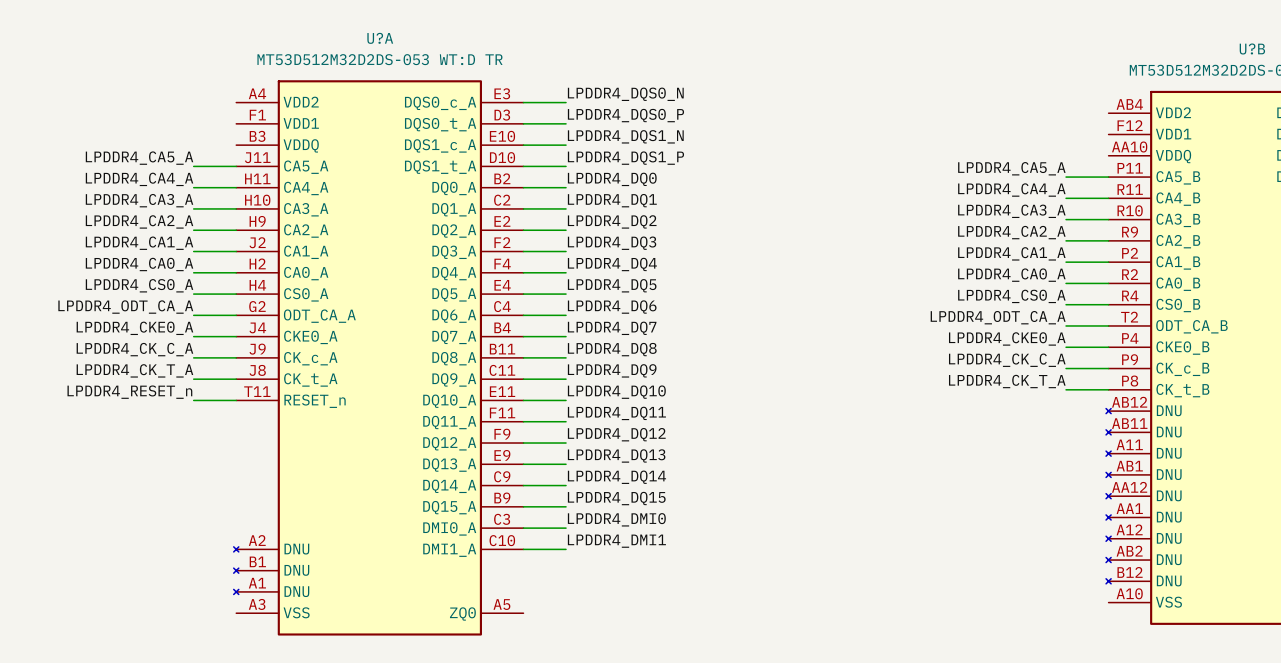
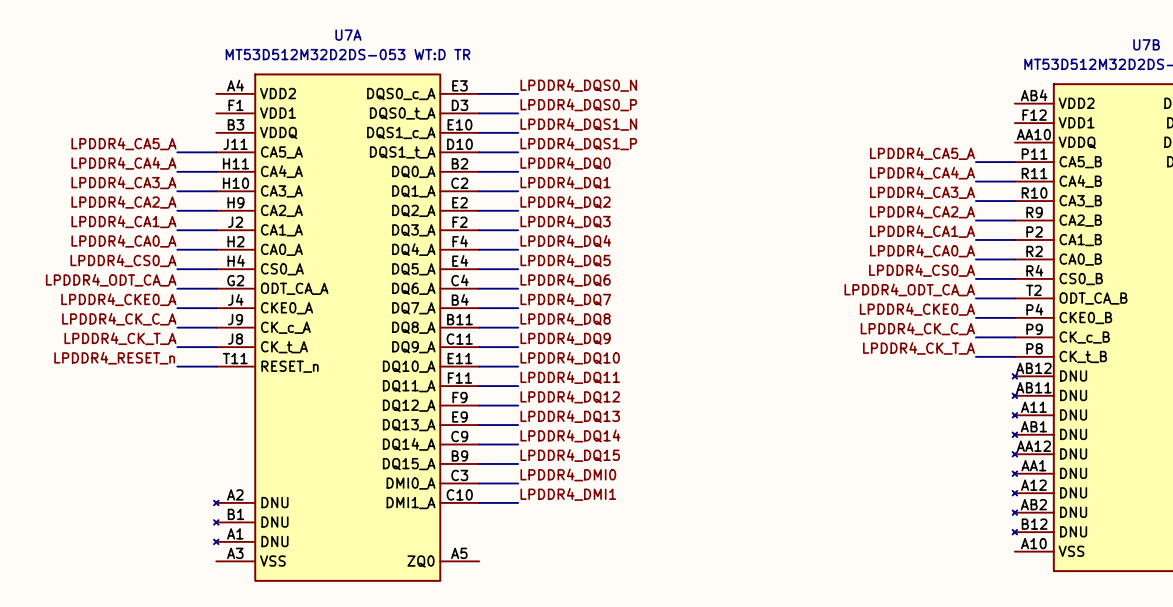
U?A name: U?A (380, 38) -> U7A (348, 35)
U?B name: U?B (1252, 48) -> U7B (1146, 44)

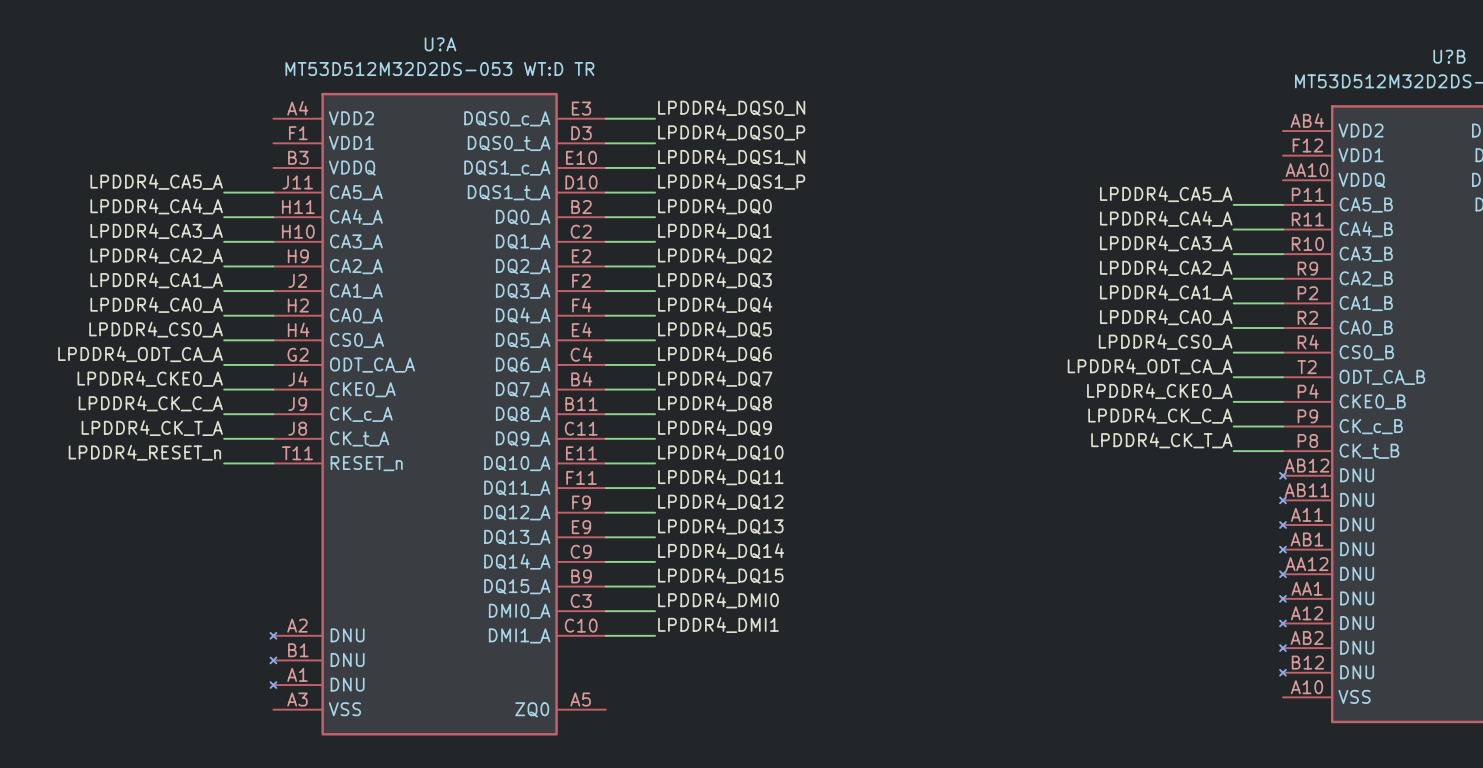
U7A name: U7A (348, 35) -> U?A (440, 44)
U7B name: U7B (1146, 44) -> U?B (1449, 56)

